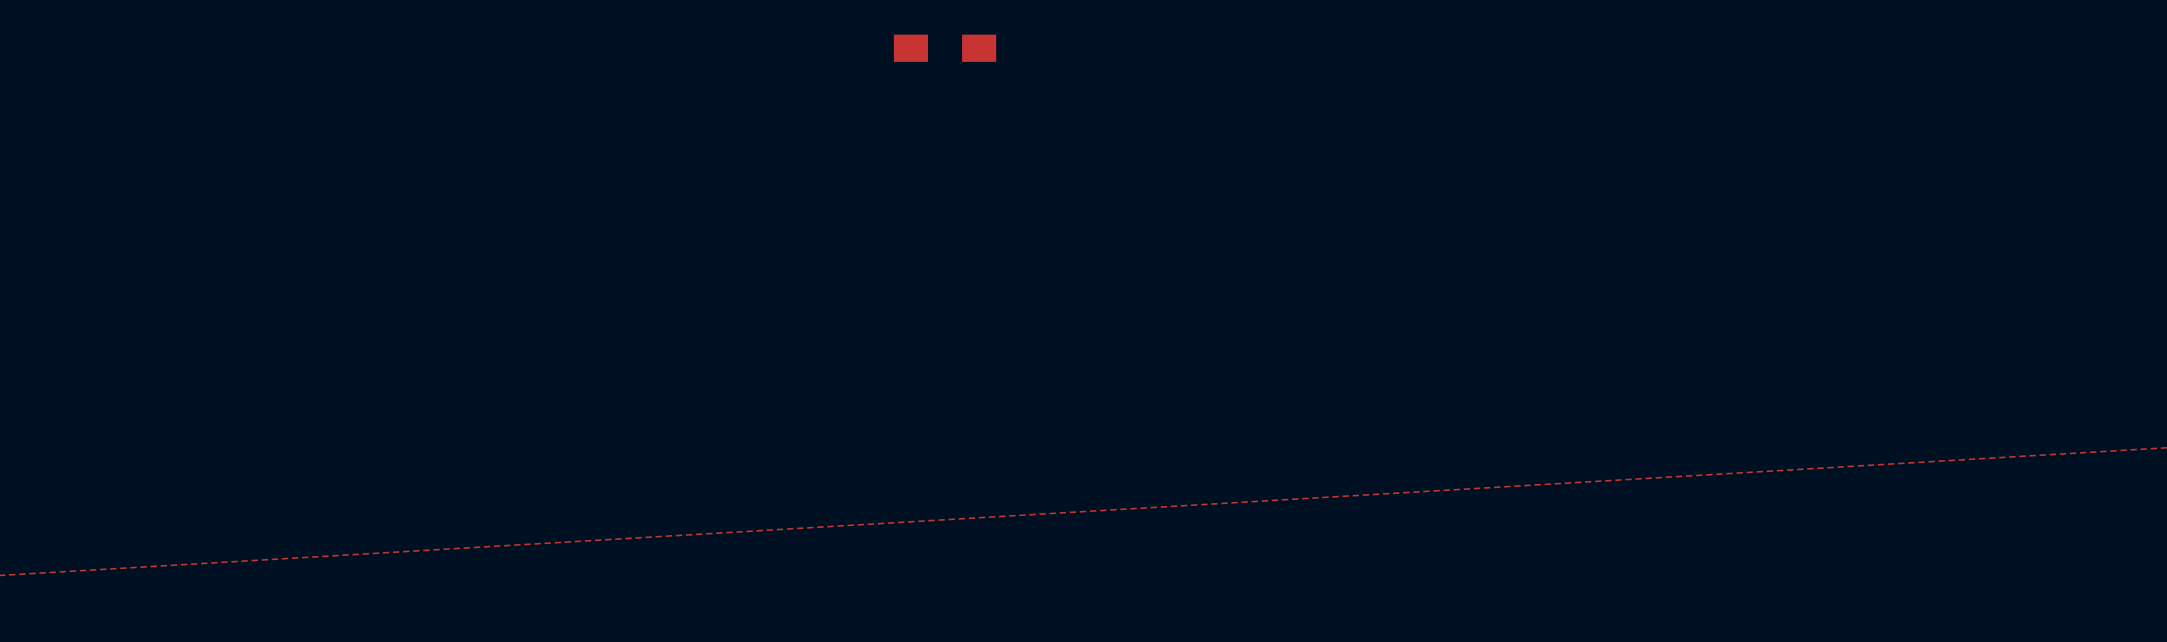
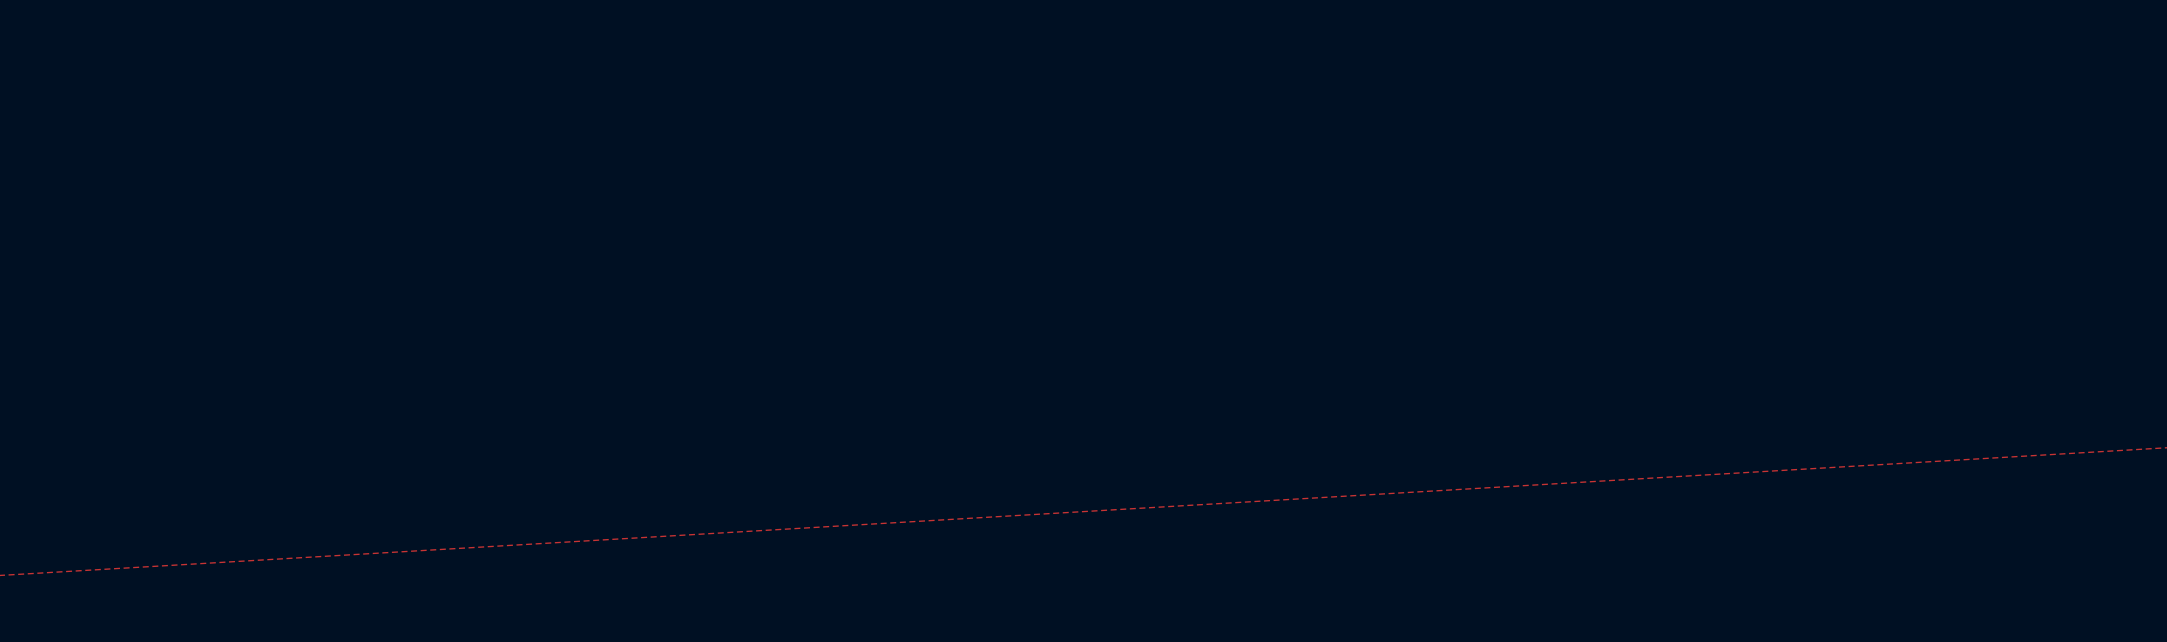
part: (945, 48) -> none

